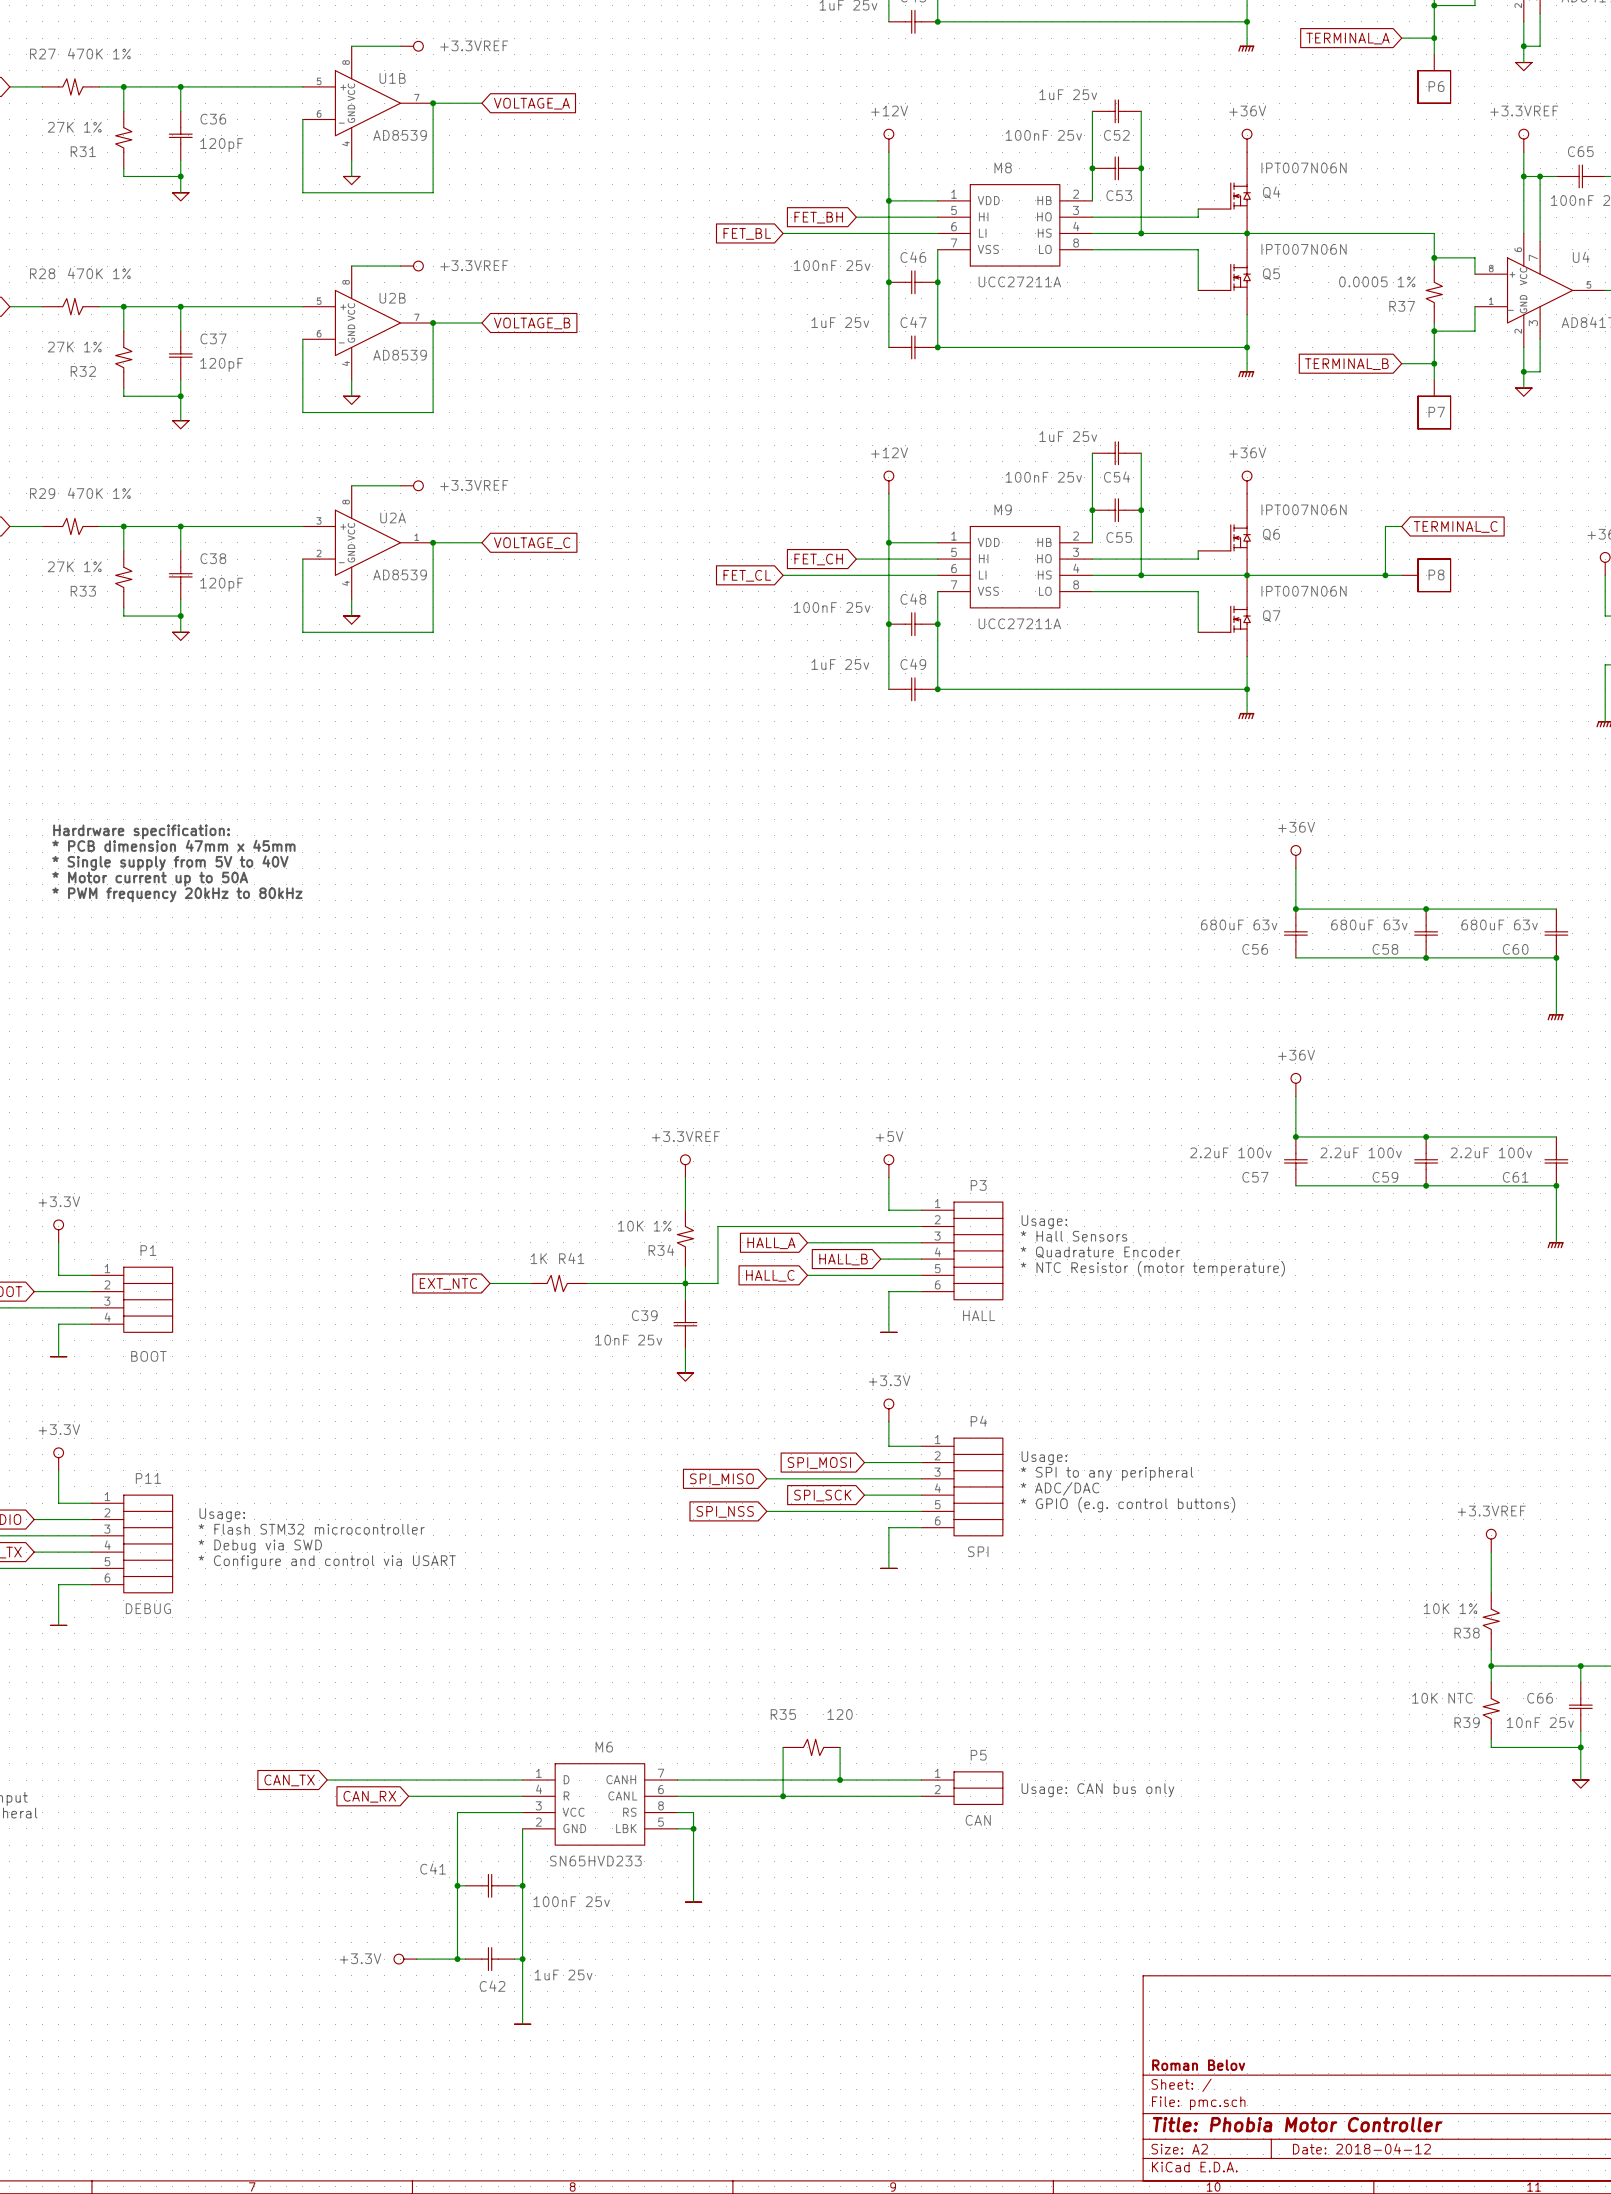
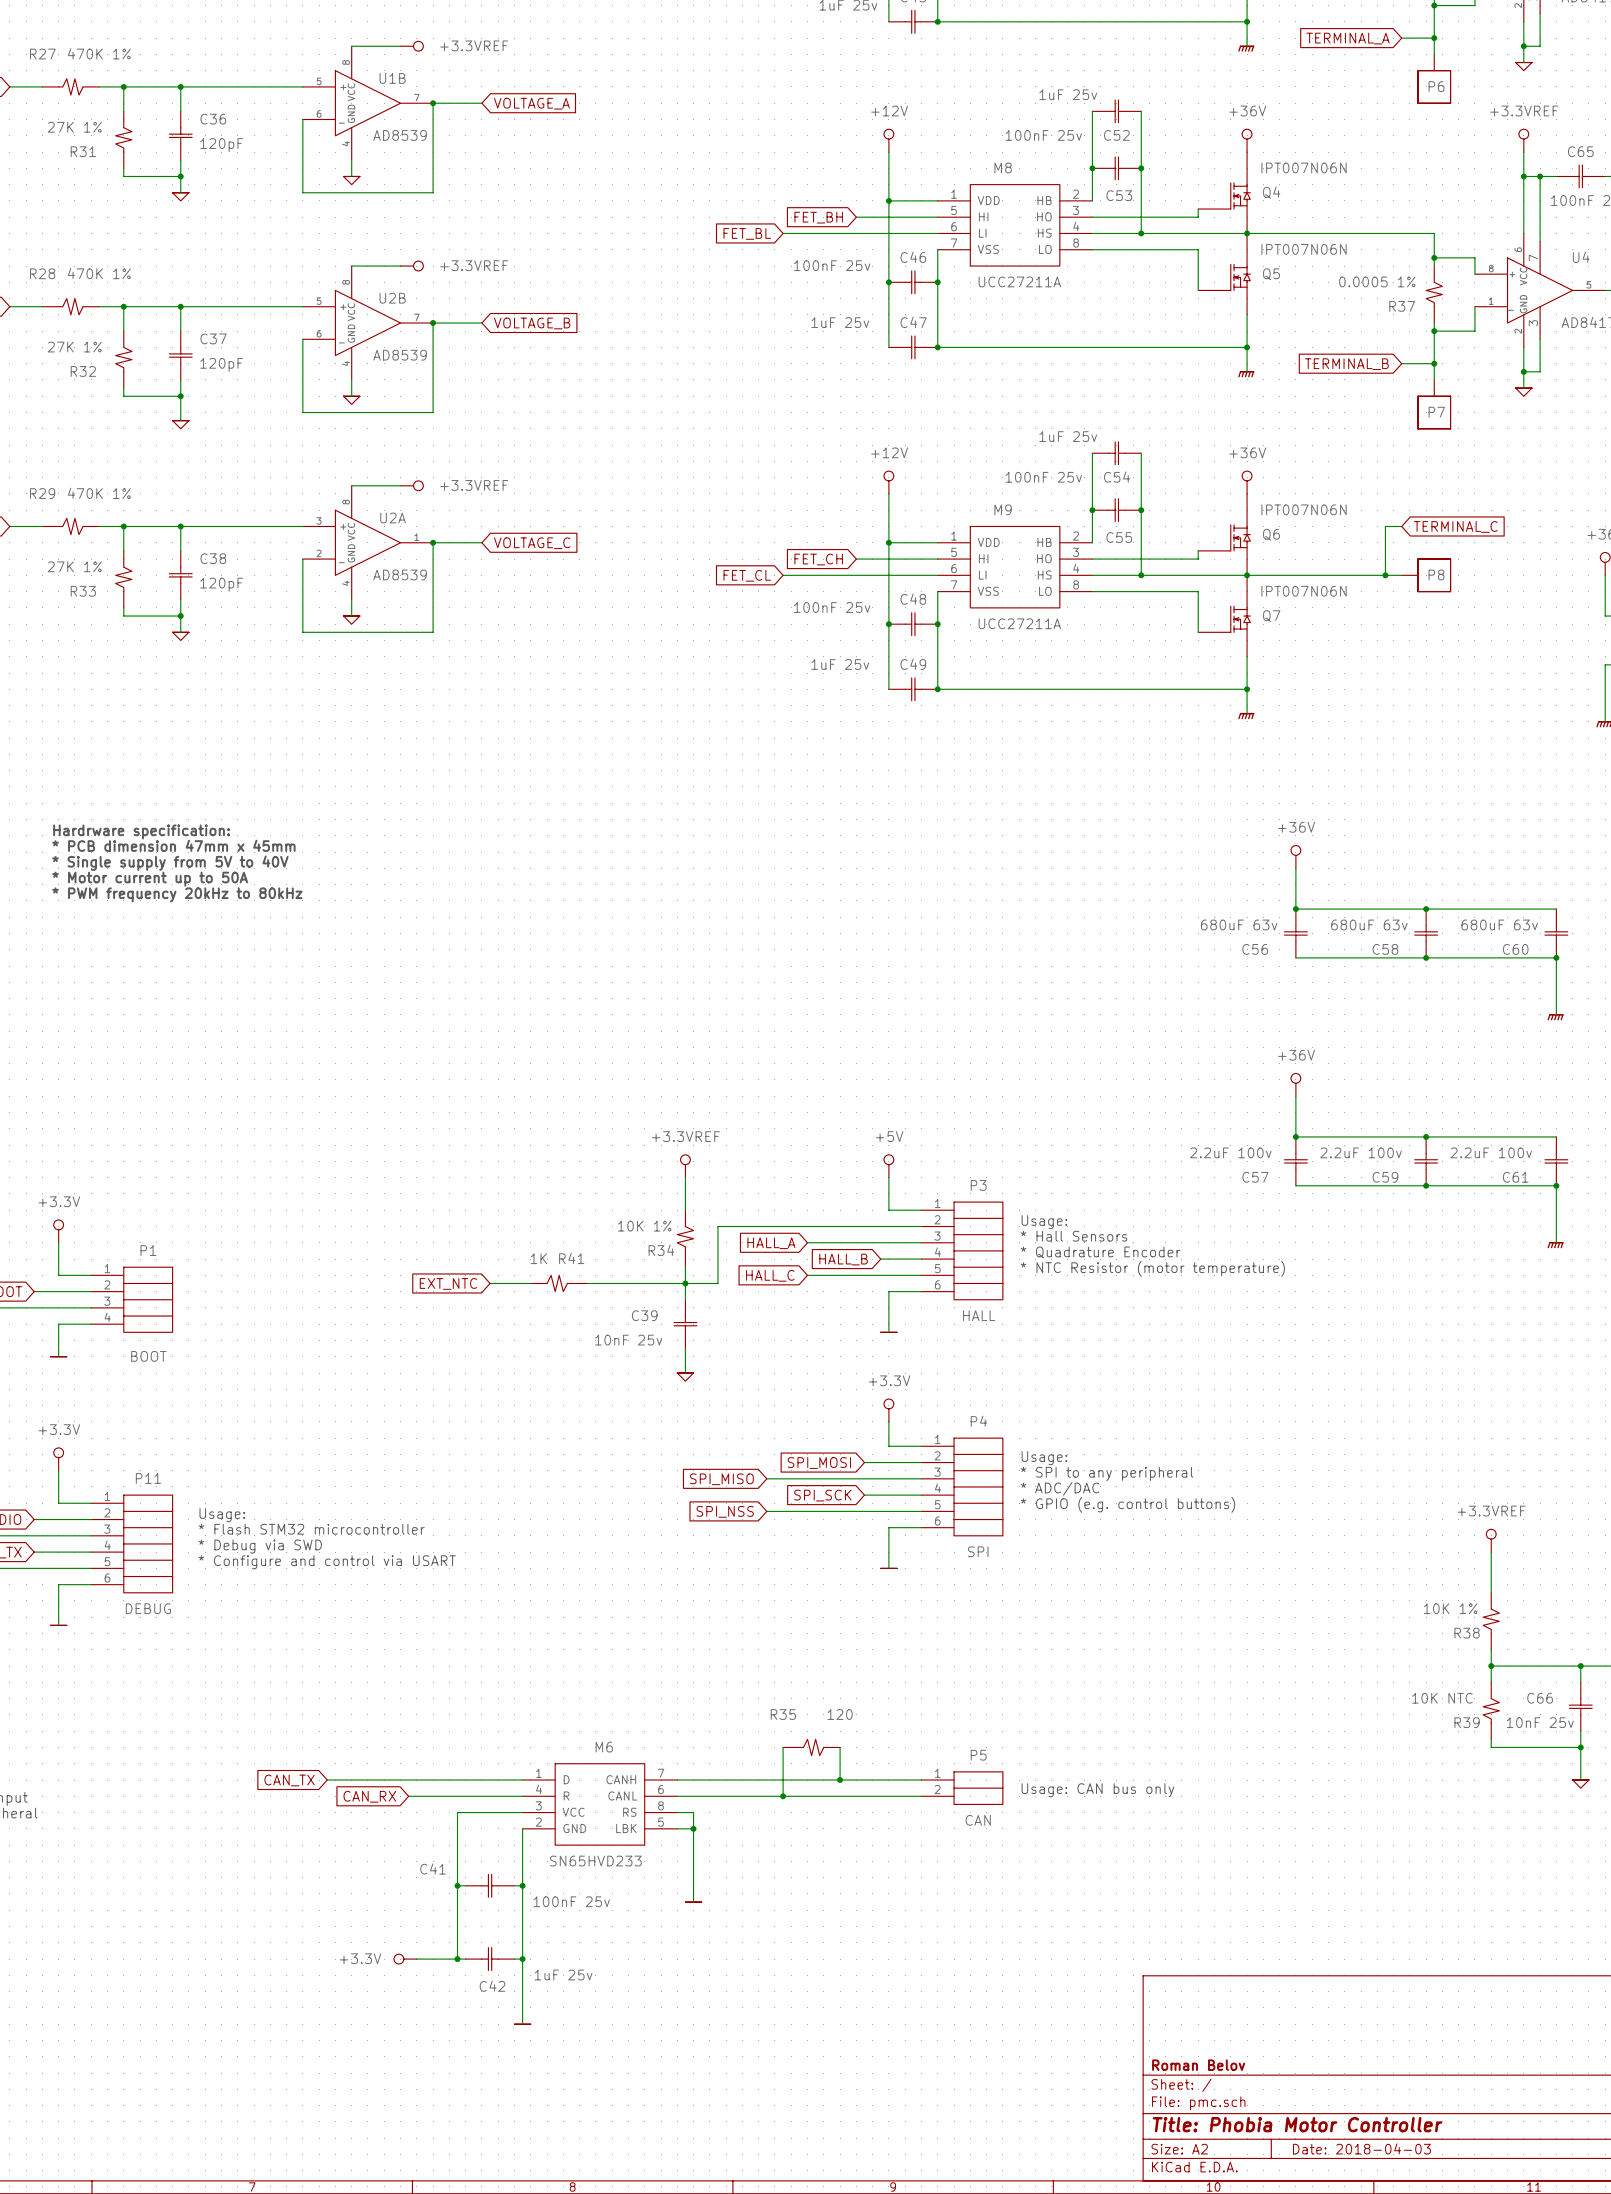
title block: Date: 2018-04-12 (1361, 2148) -> Date: 2018-04-03 (1361, 2148)

